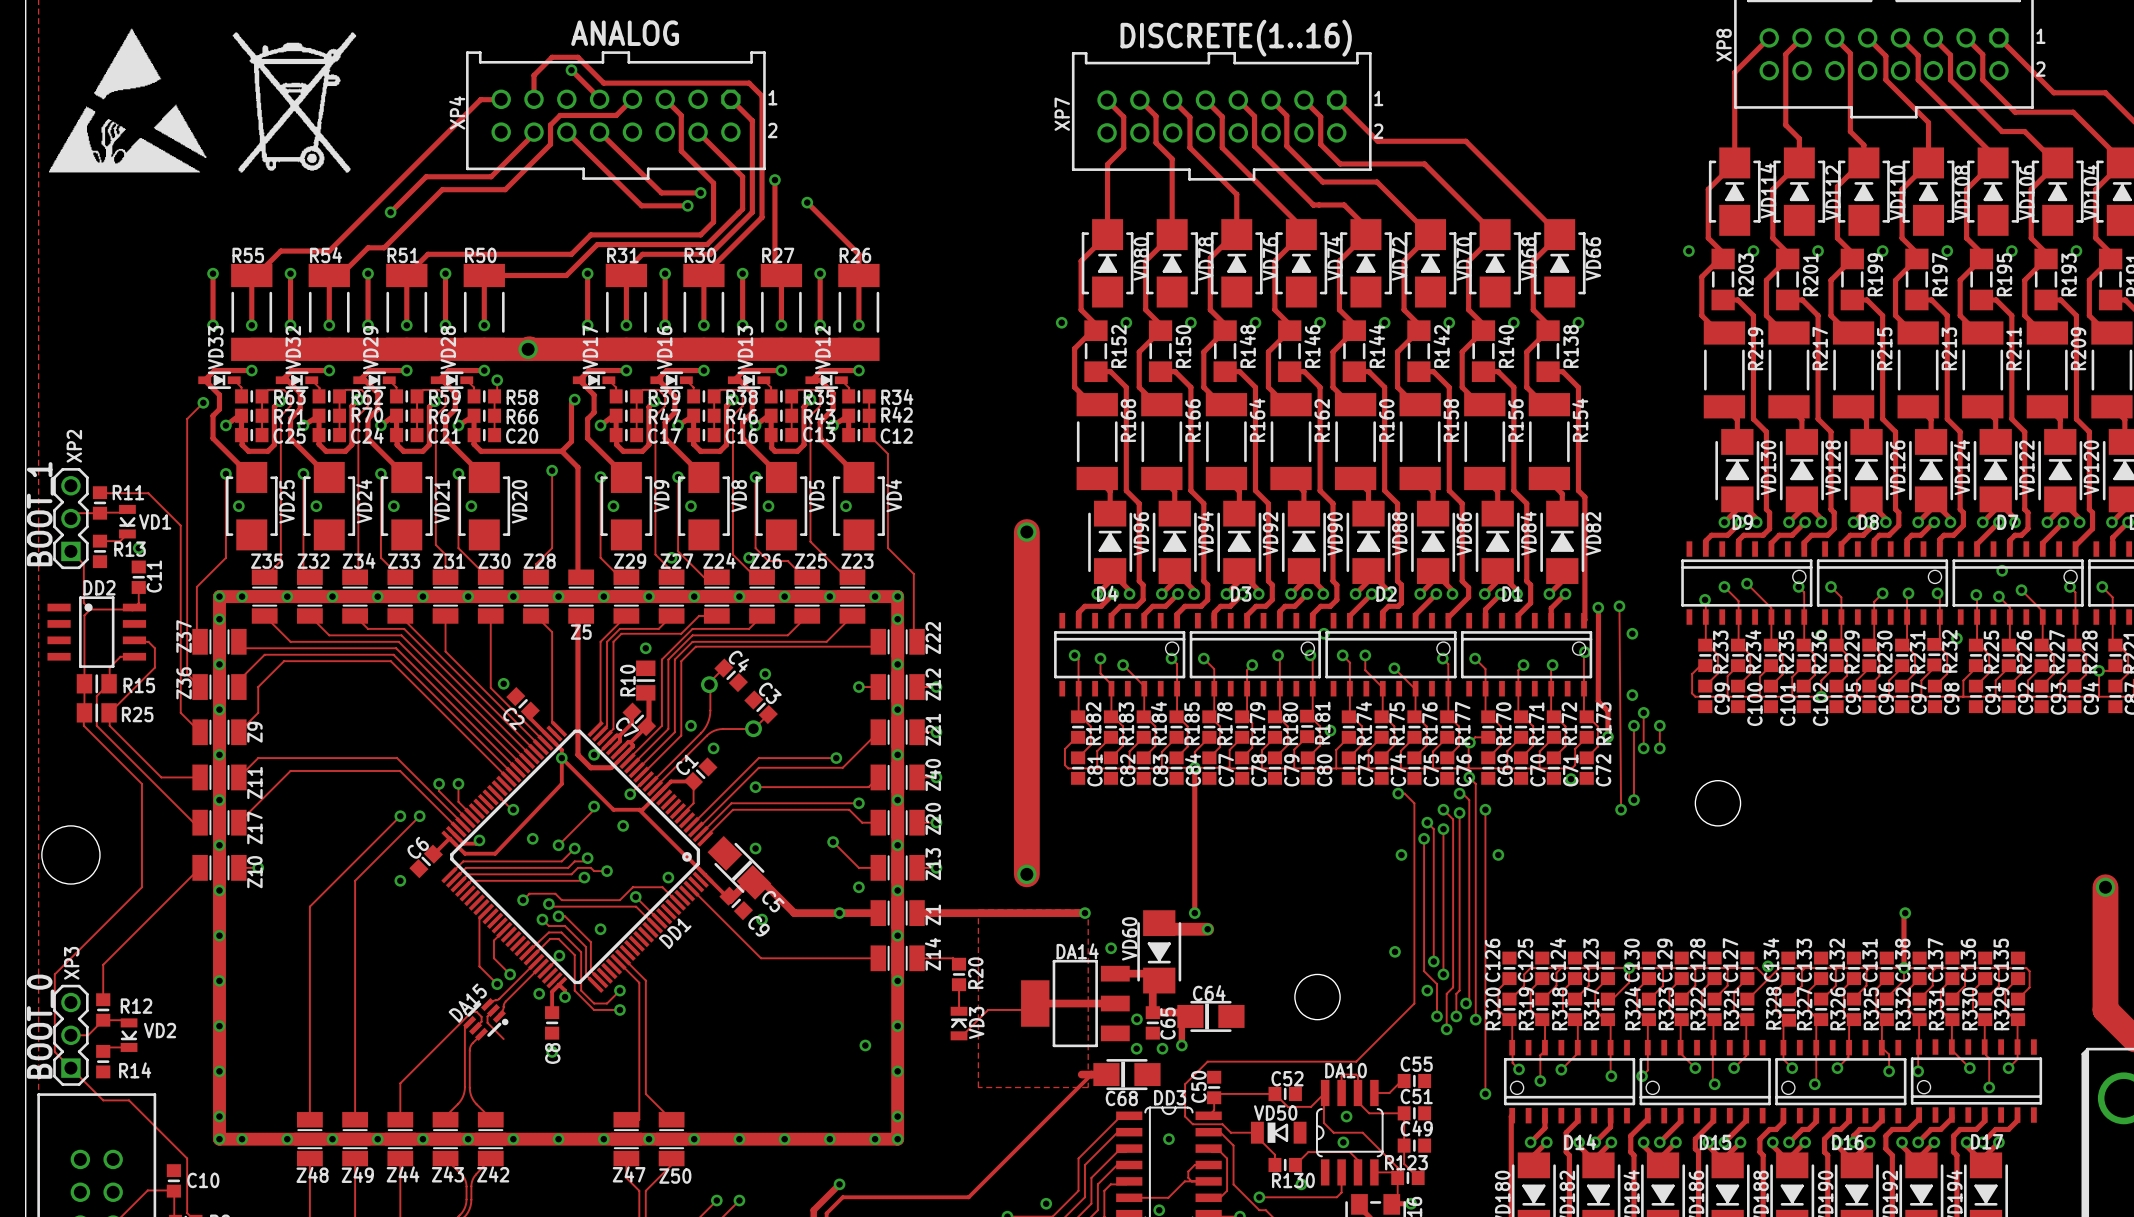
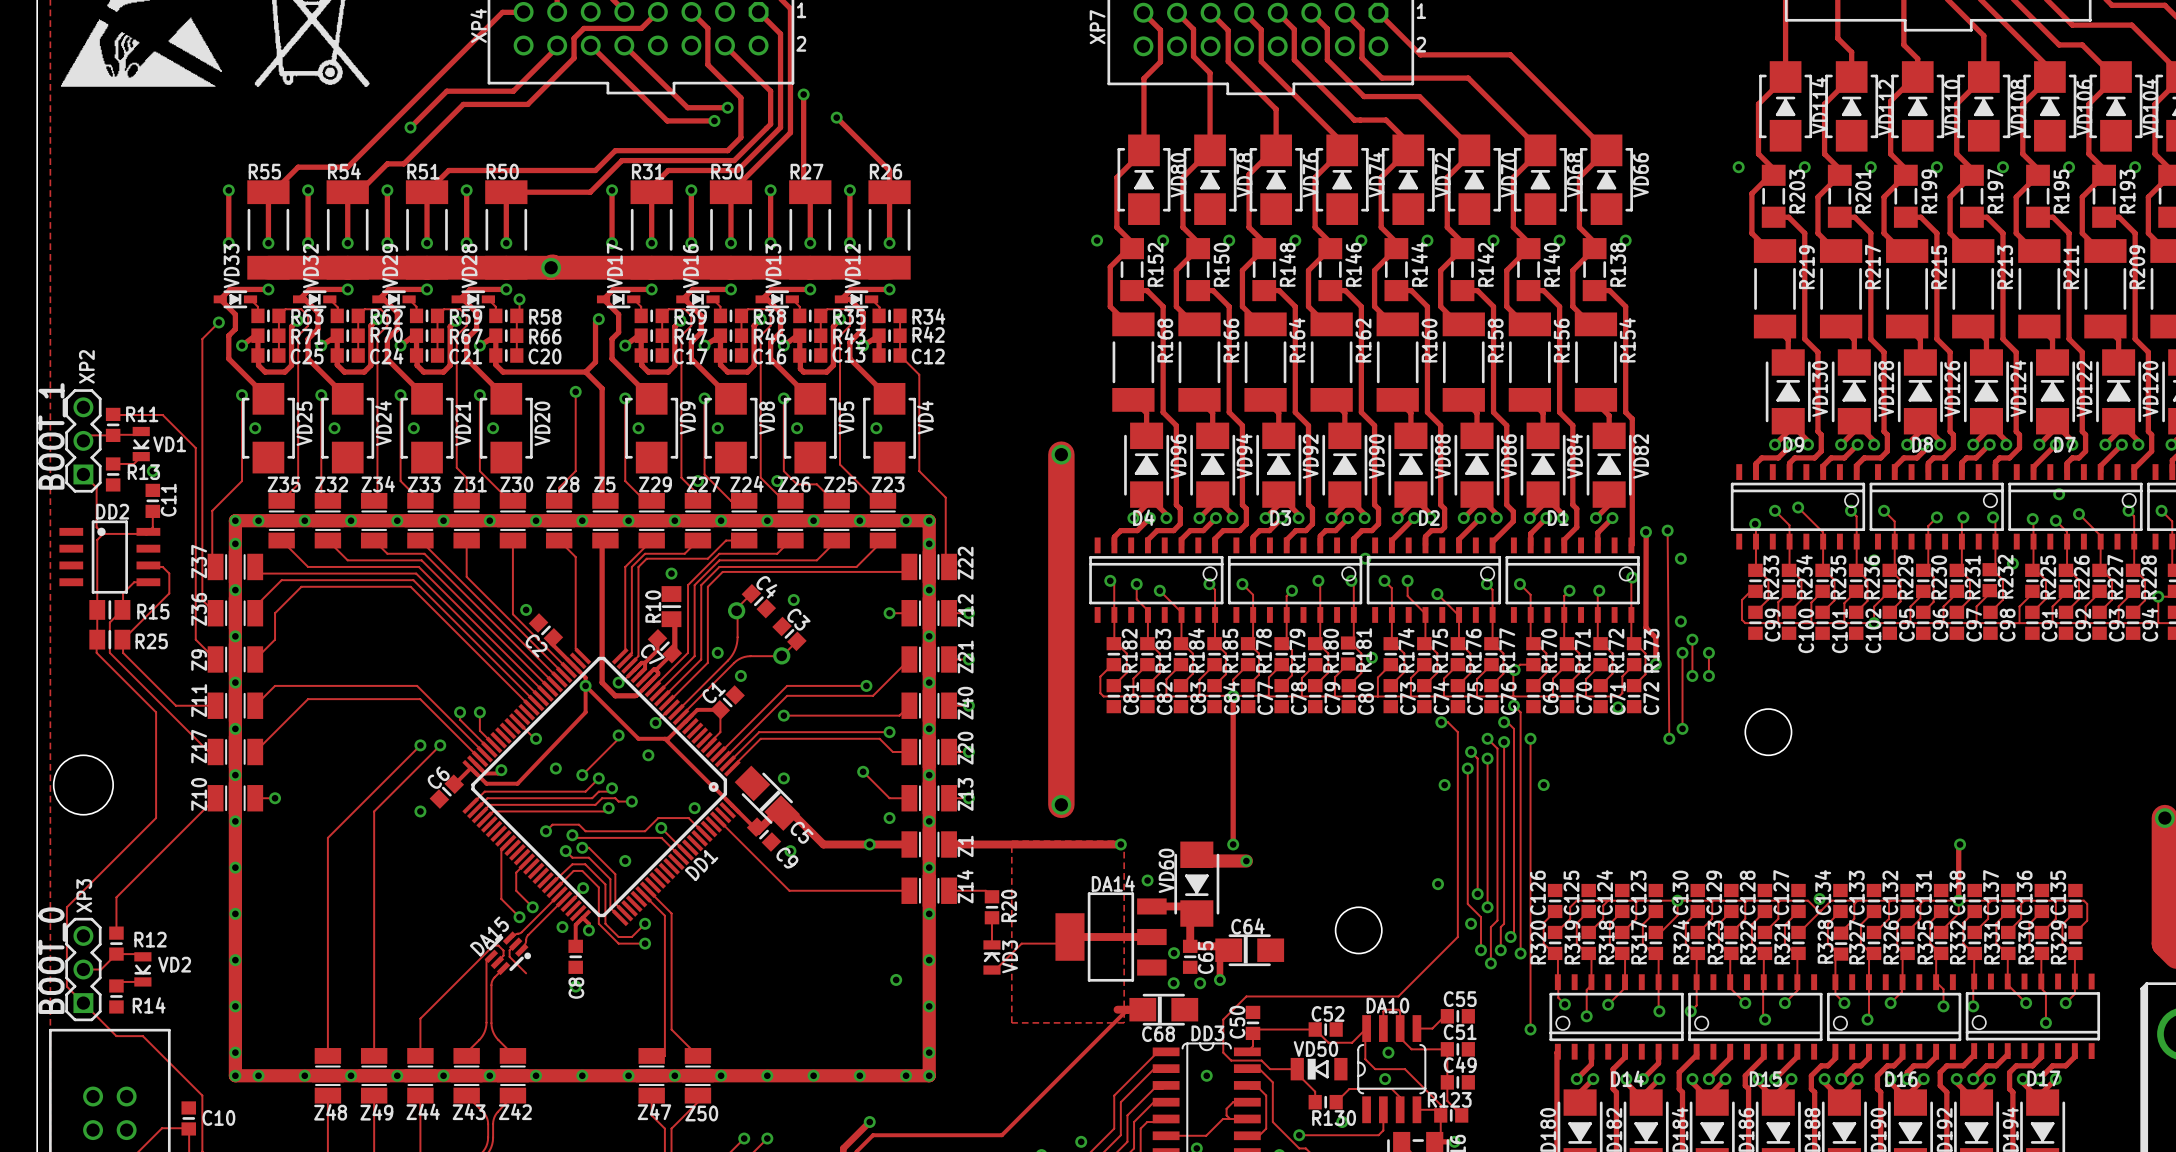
Z5 name position: Z5 (581, 632) -> Z5 (604, 484)
Z9 name position: Z9 (254, 732) -> Z9 (199, 660)
Z11 name position: Z11 (254, 783) -> Z11 (199, 700)
Z17 name position: Z17 (254, 827) -> Z17 (199, 746)
Z10 name position: Z10 (254, 872) -> Z10 (199, 794)

